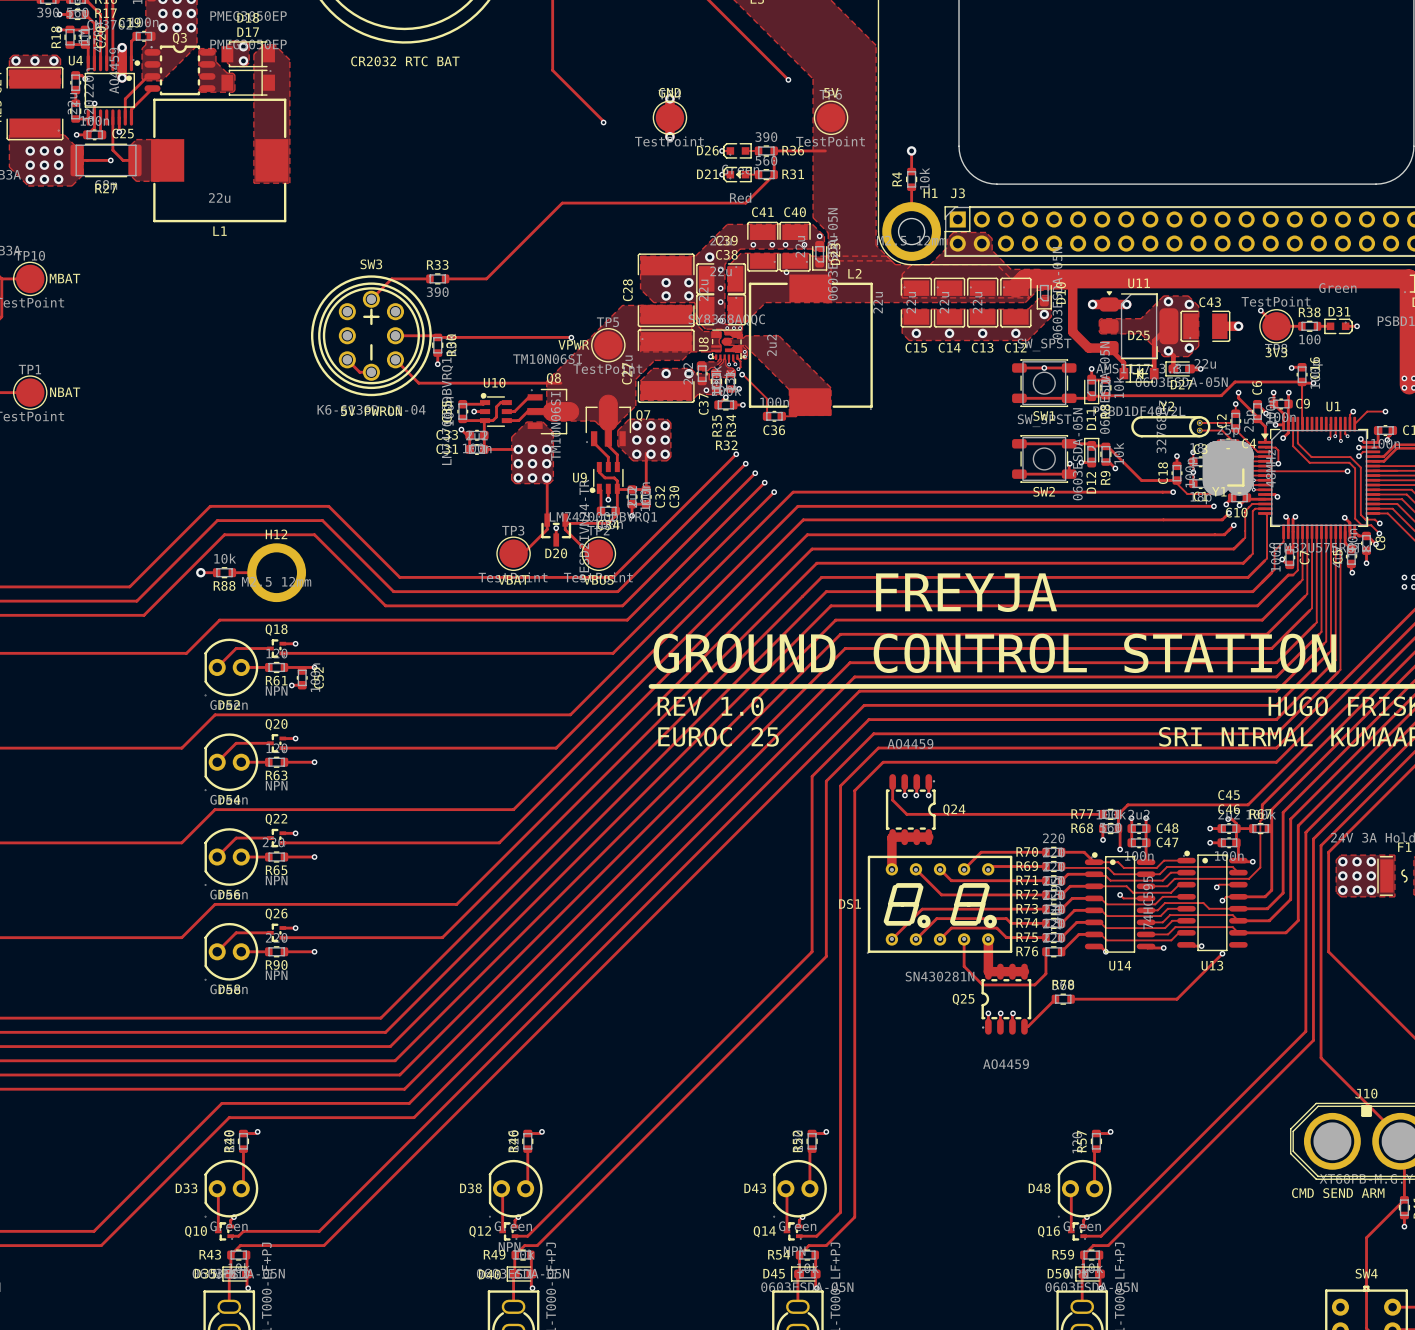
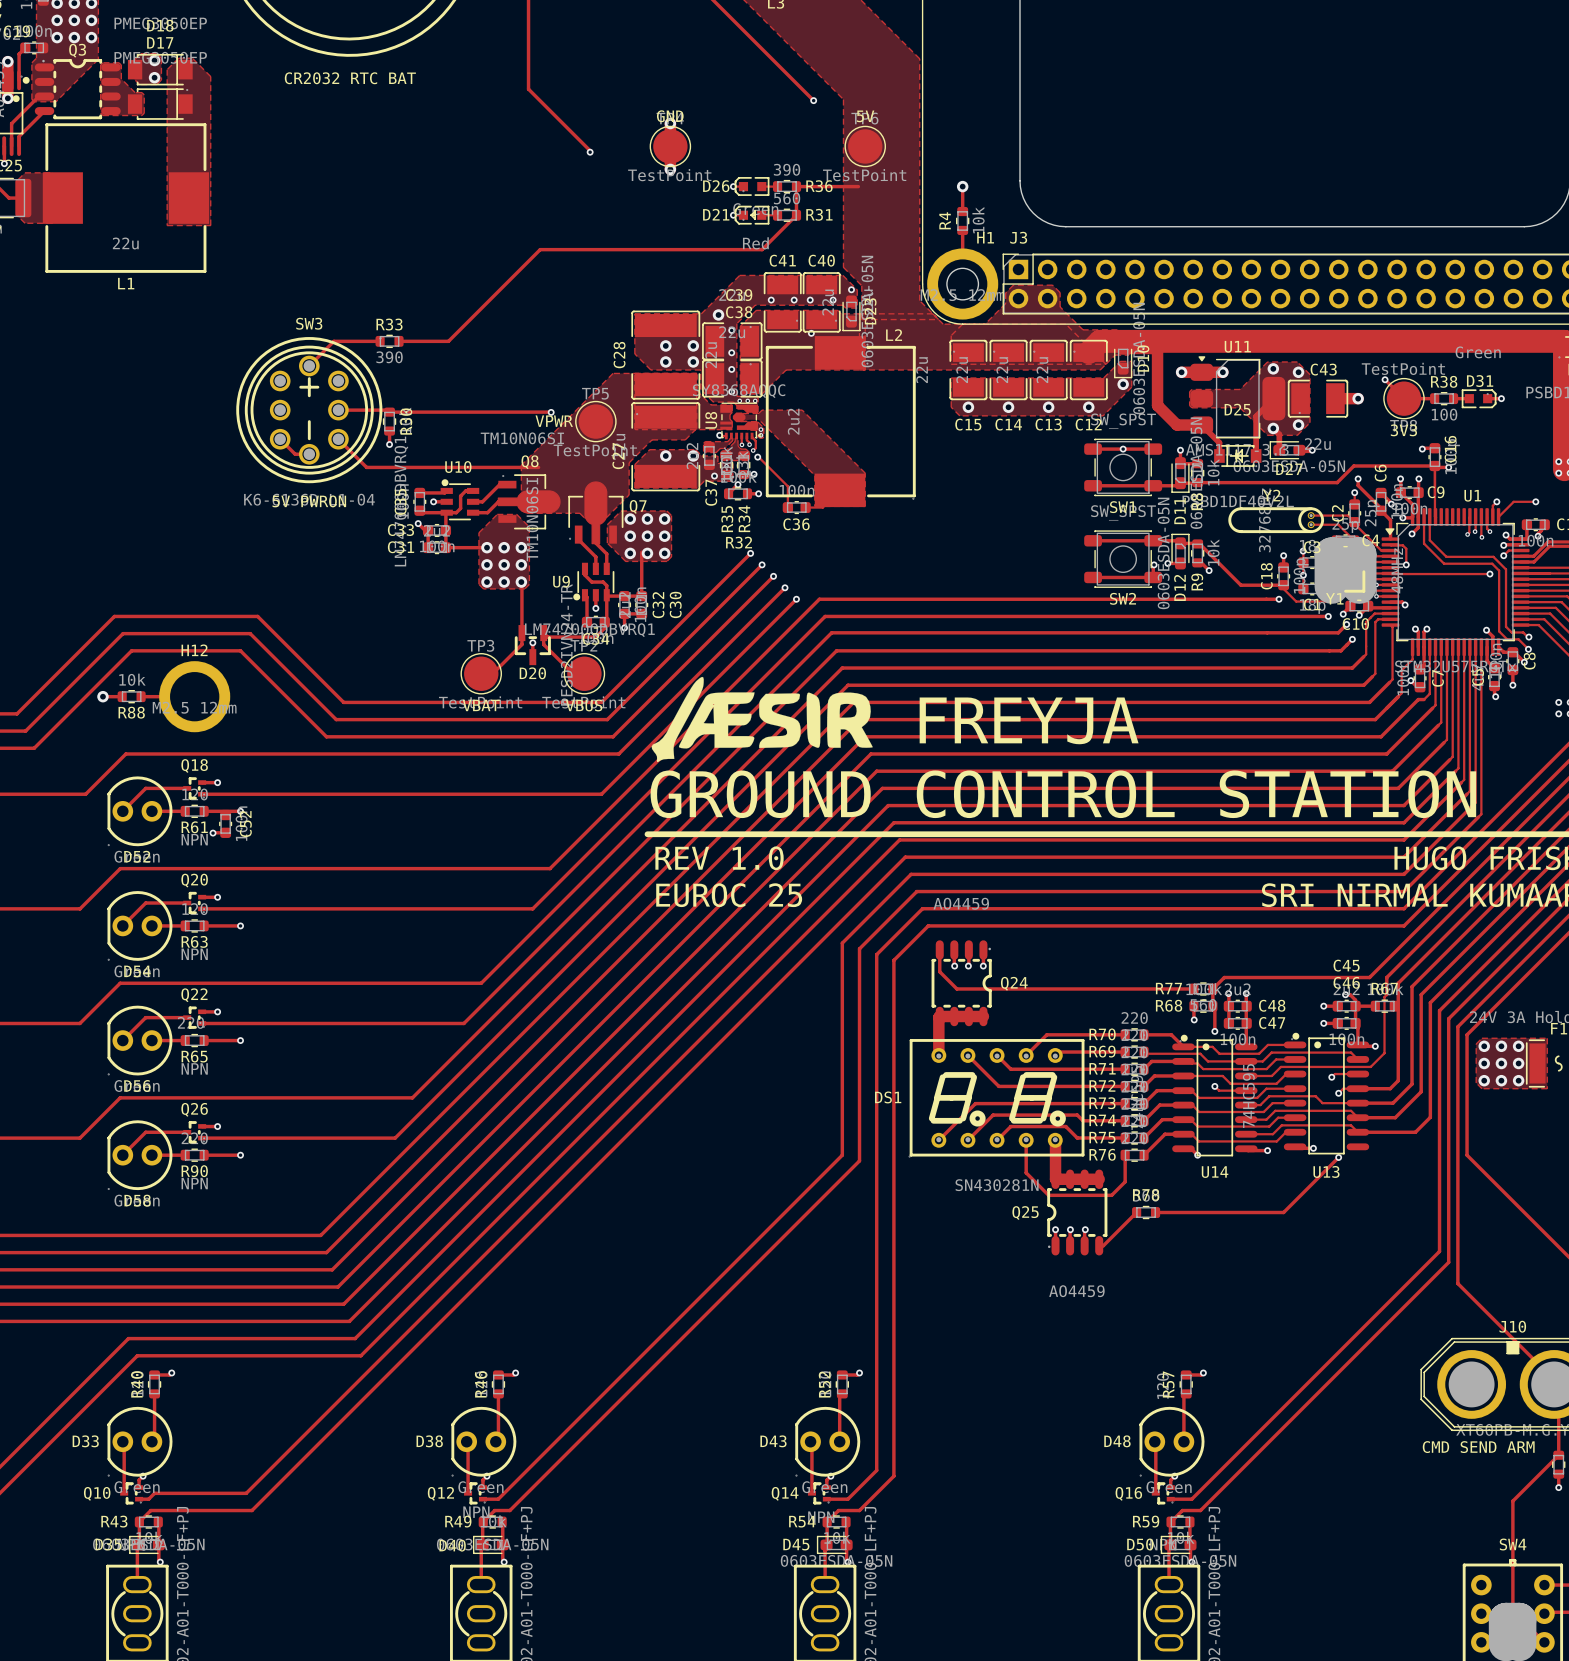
drawing: none -> [651, 676, 873, 763]

